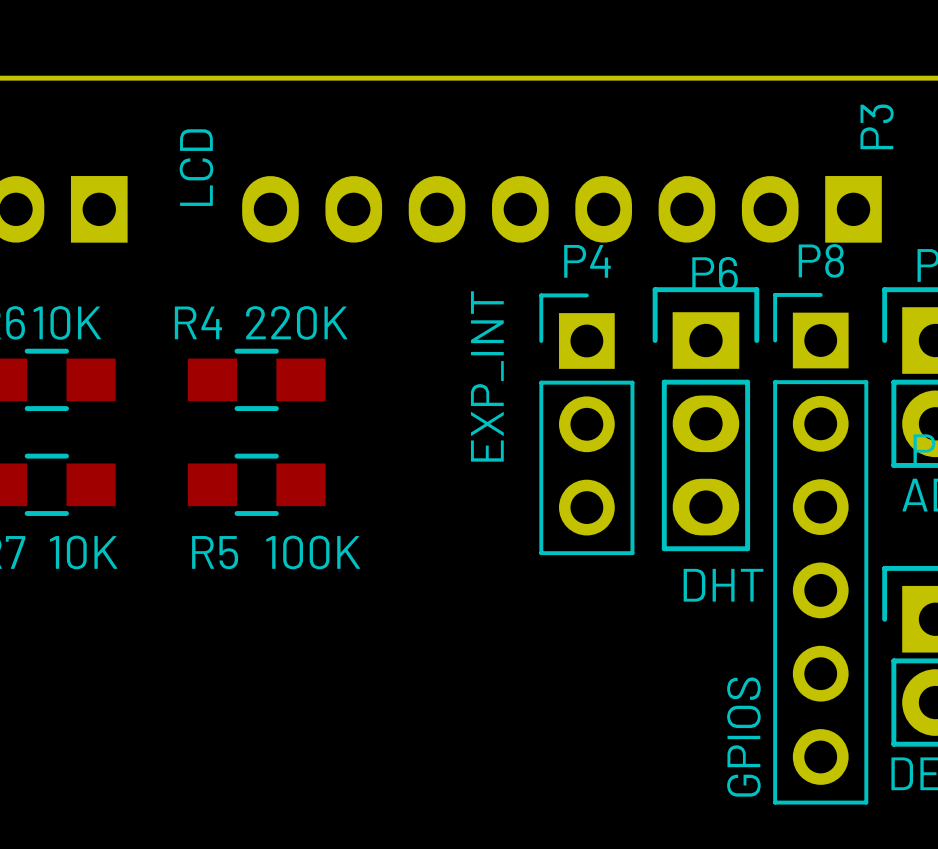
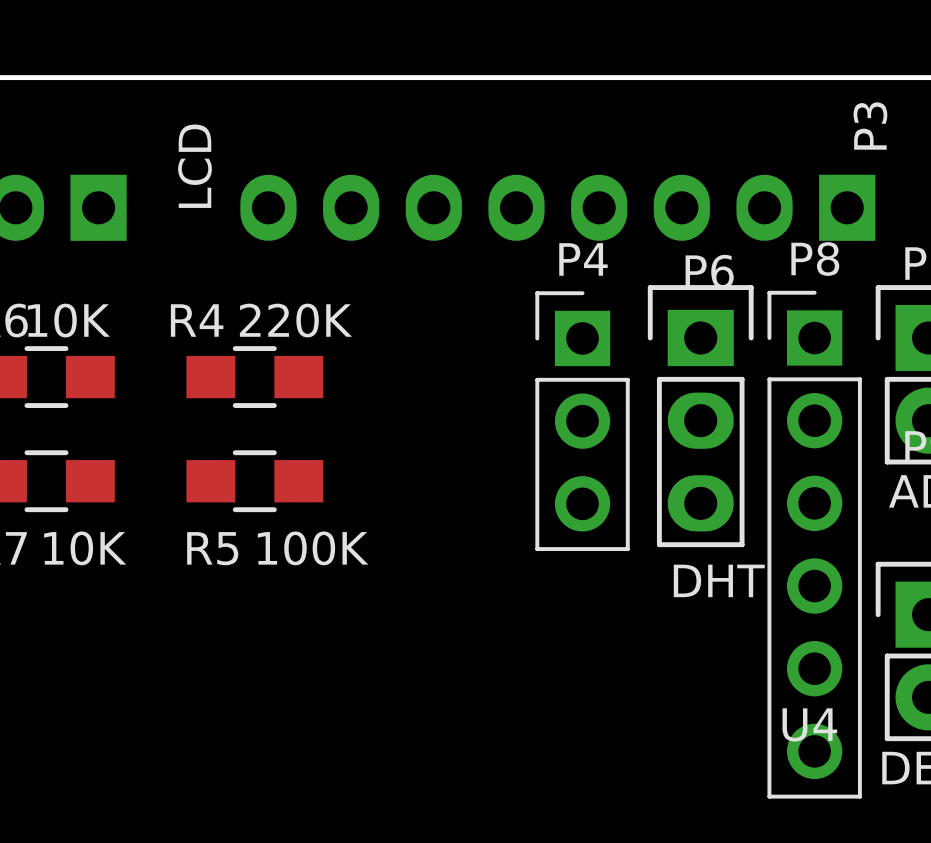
P4 value: EXP_INT (487, 376) -> none
U4 name: none -> U4 (809, 724)
P8 value: GPIOS (743, 737) -> none

